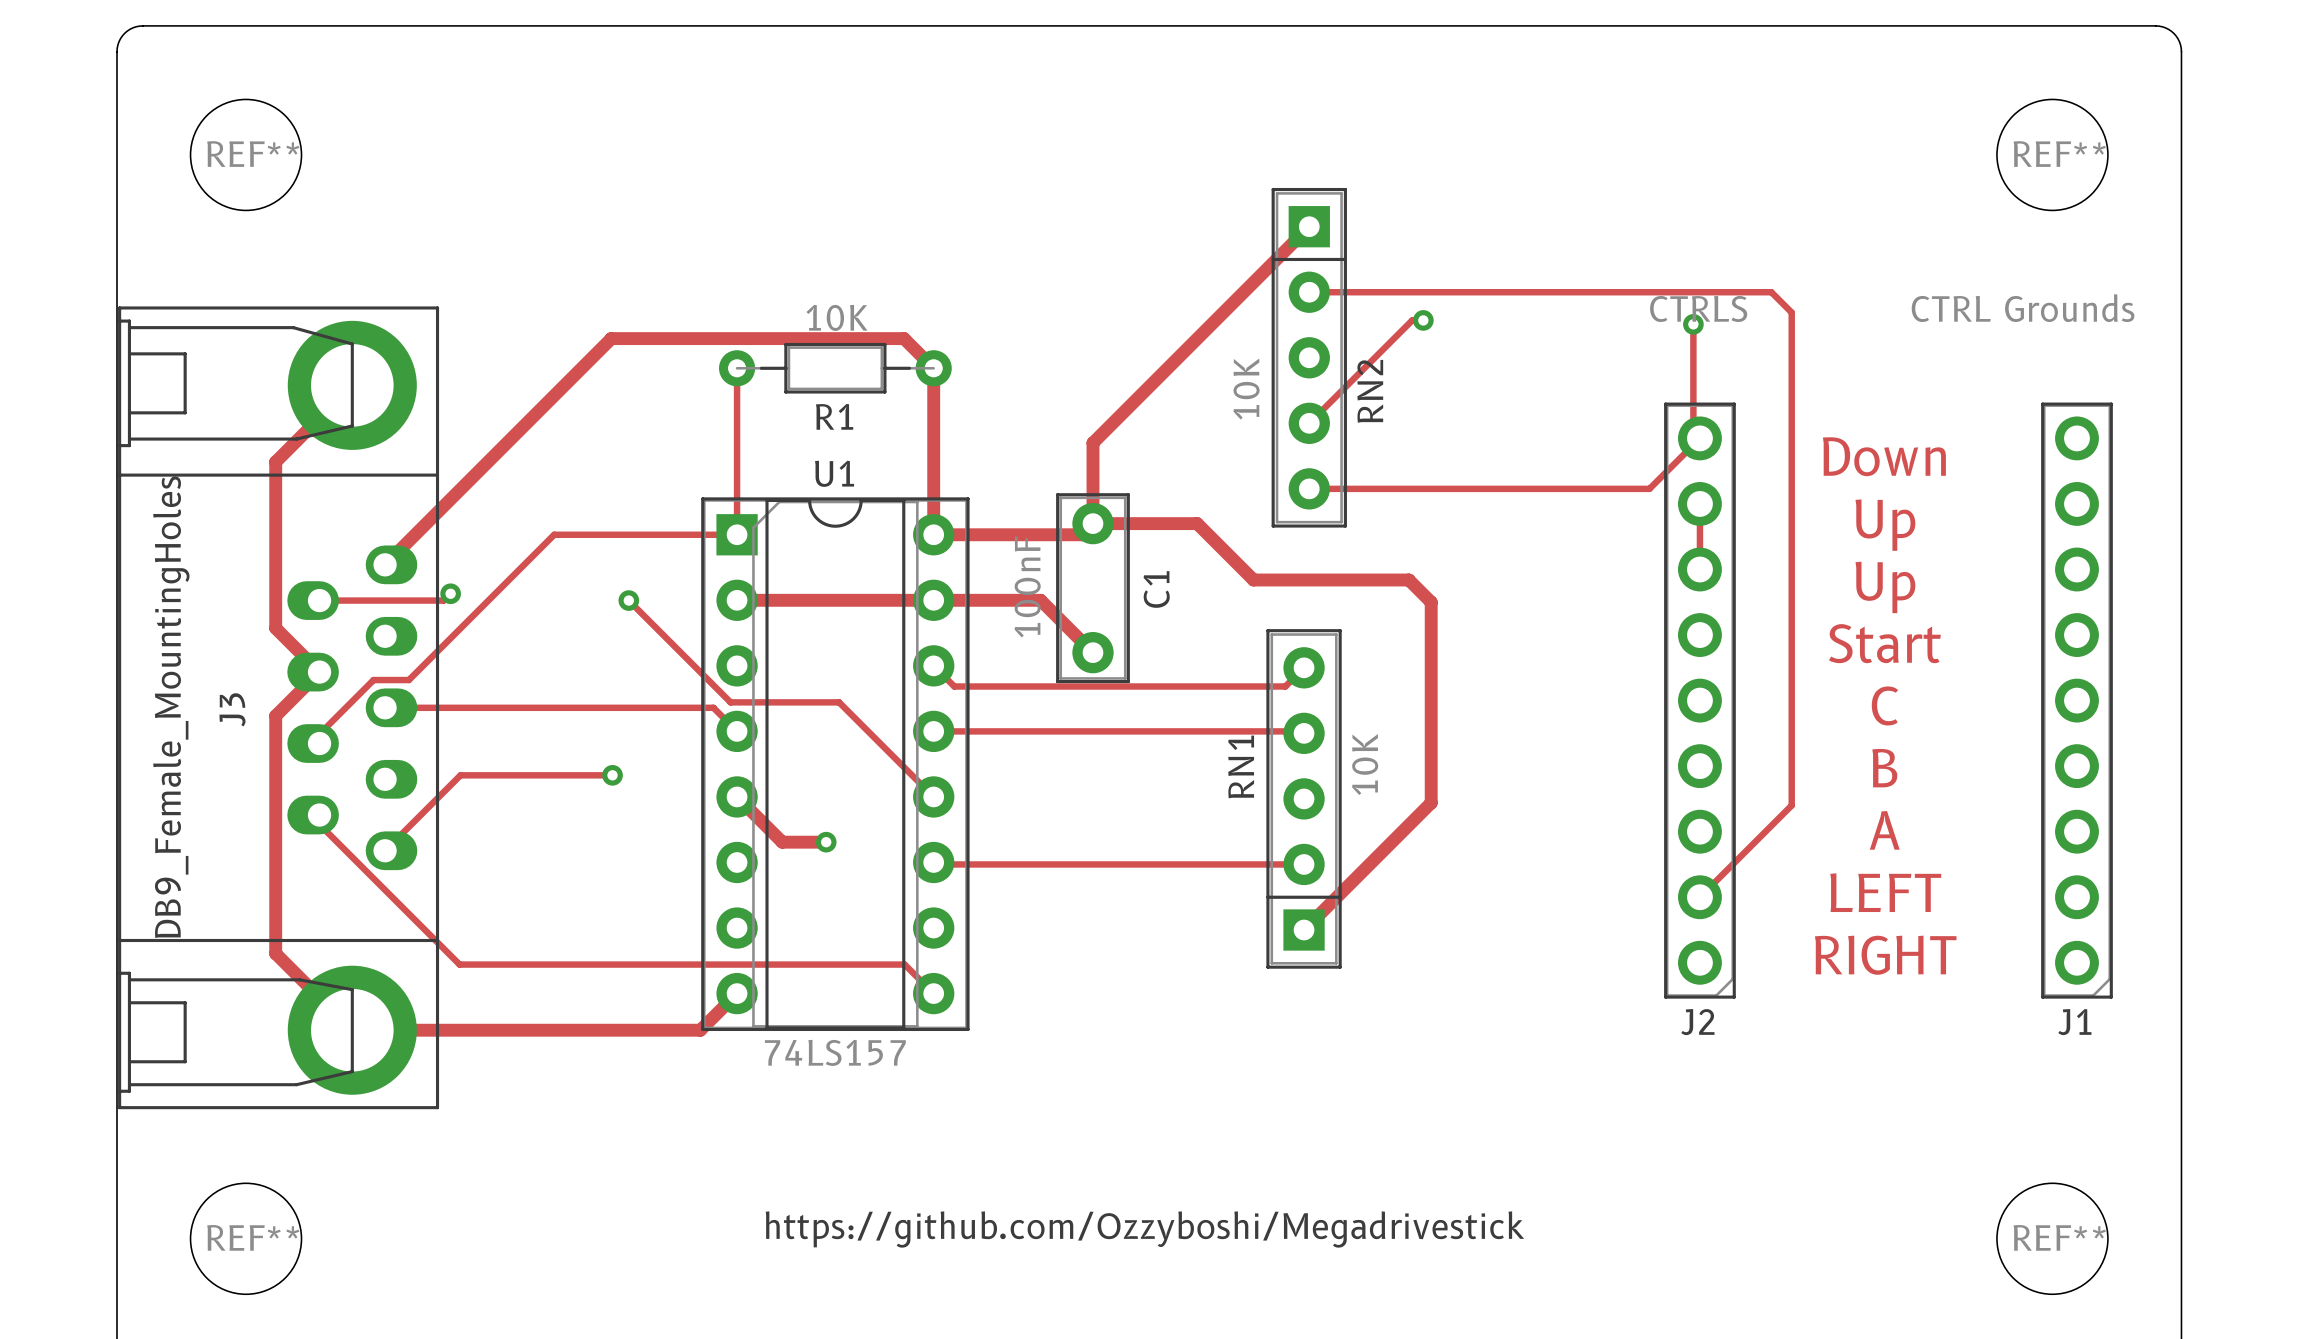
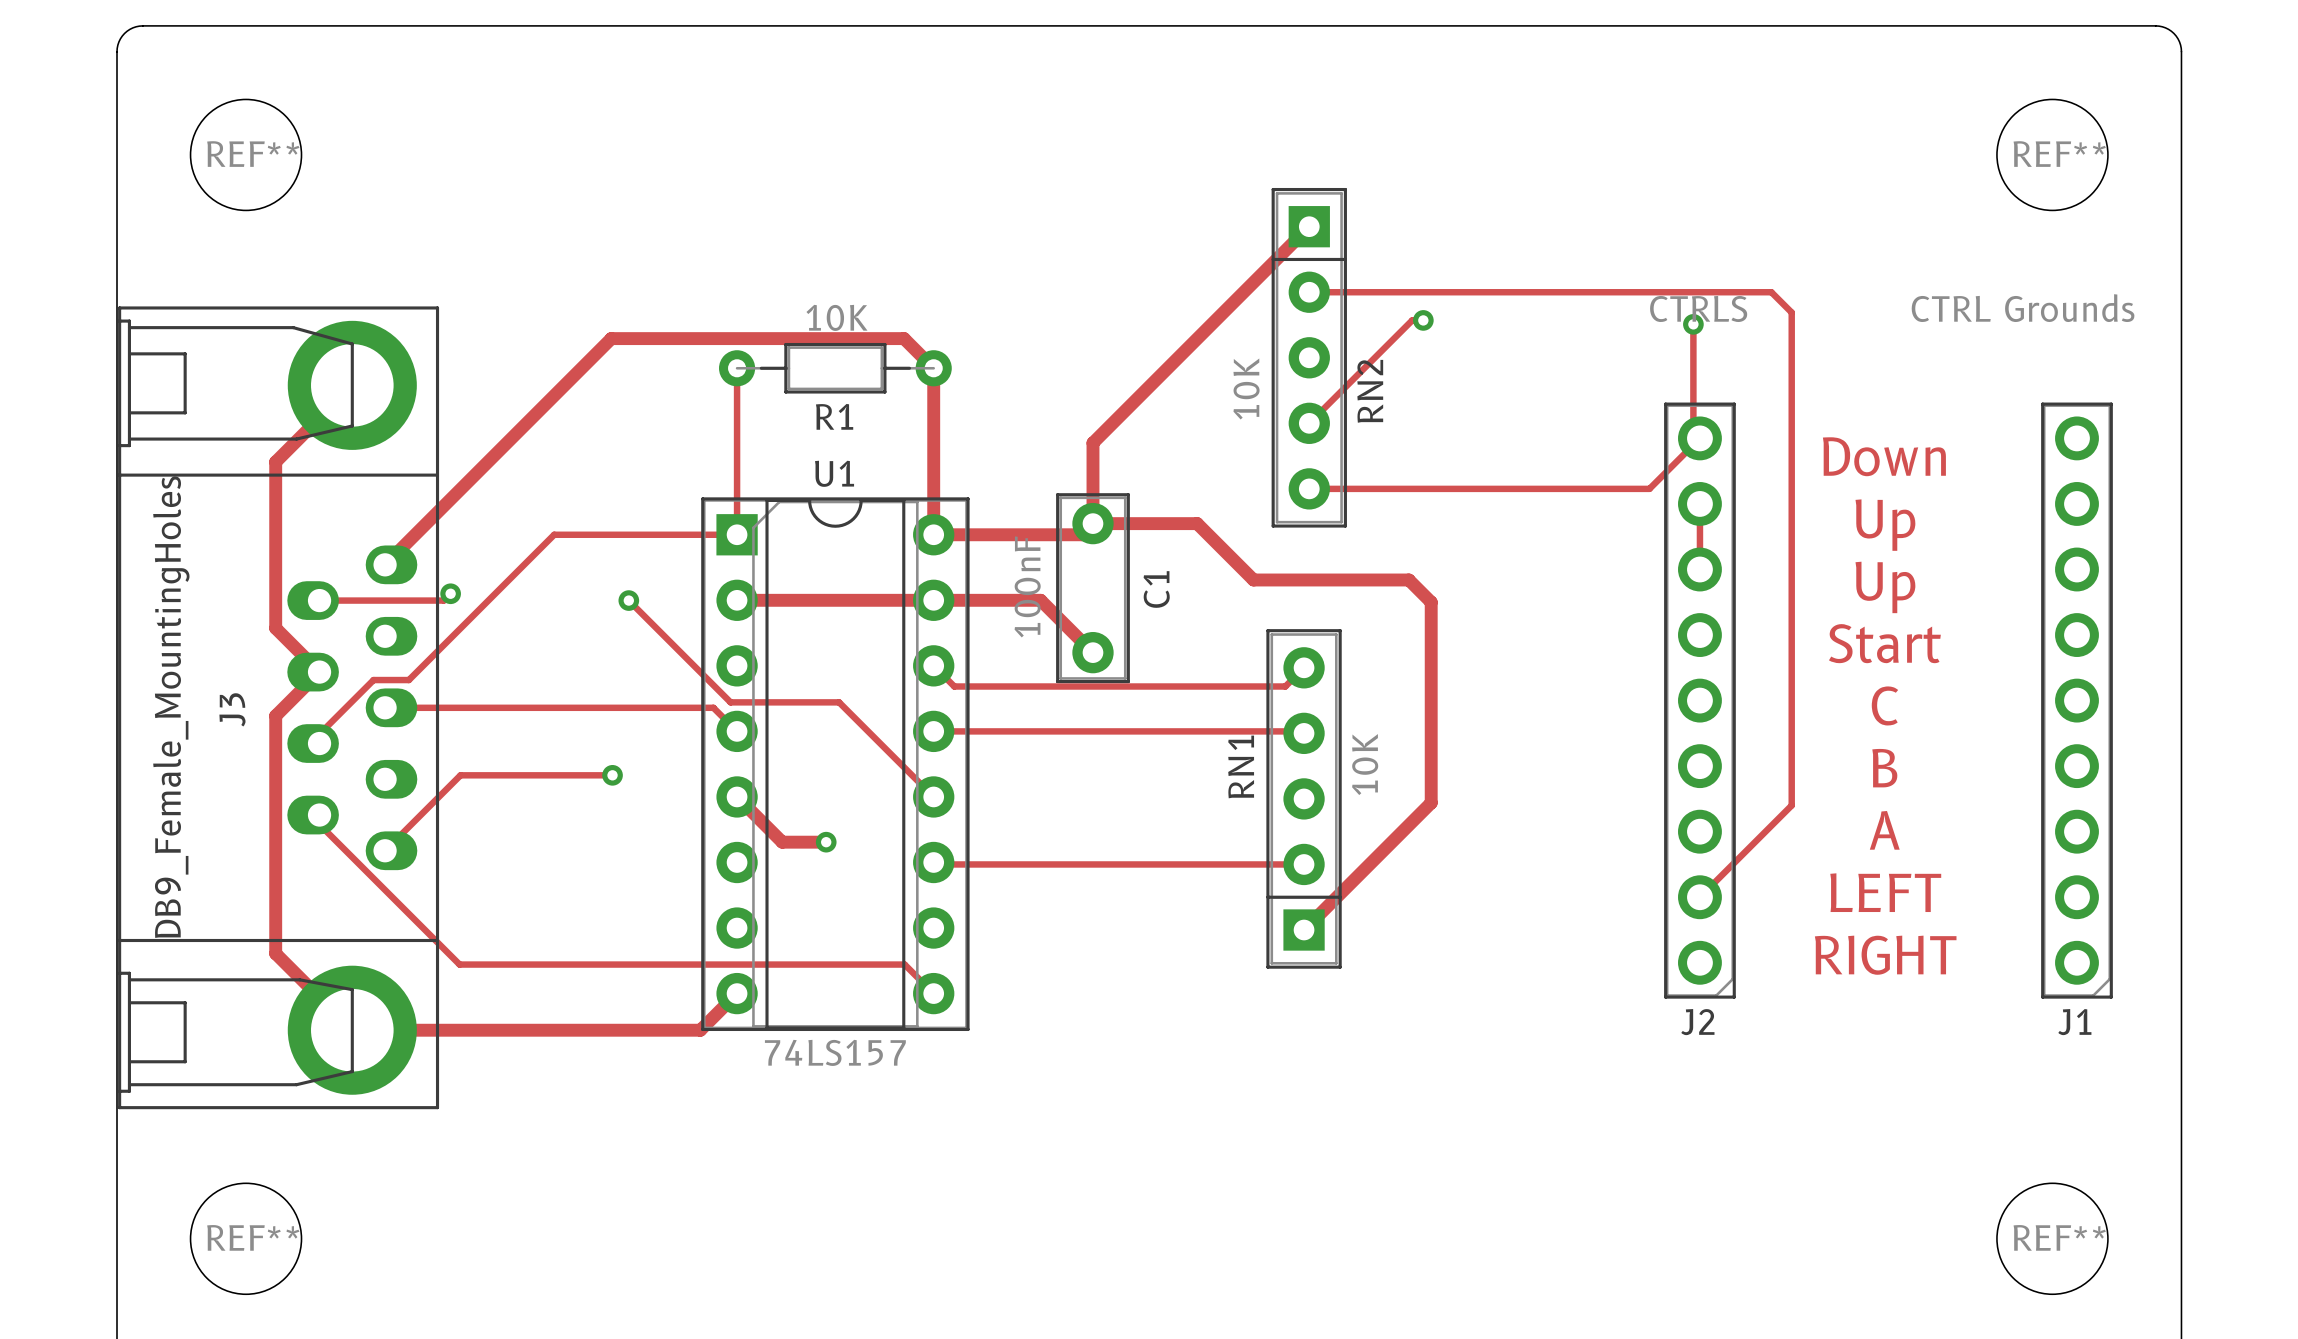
text: https://github.com/Ozzyboshi/Megadrivestick (1144, 1229) -> none

